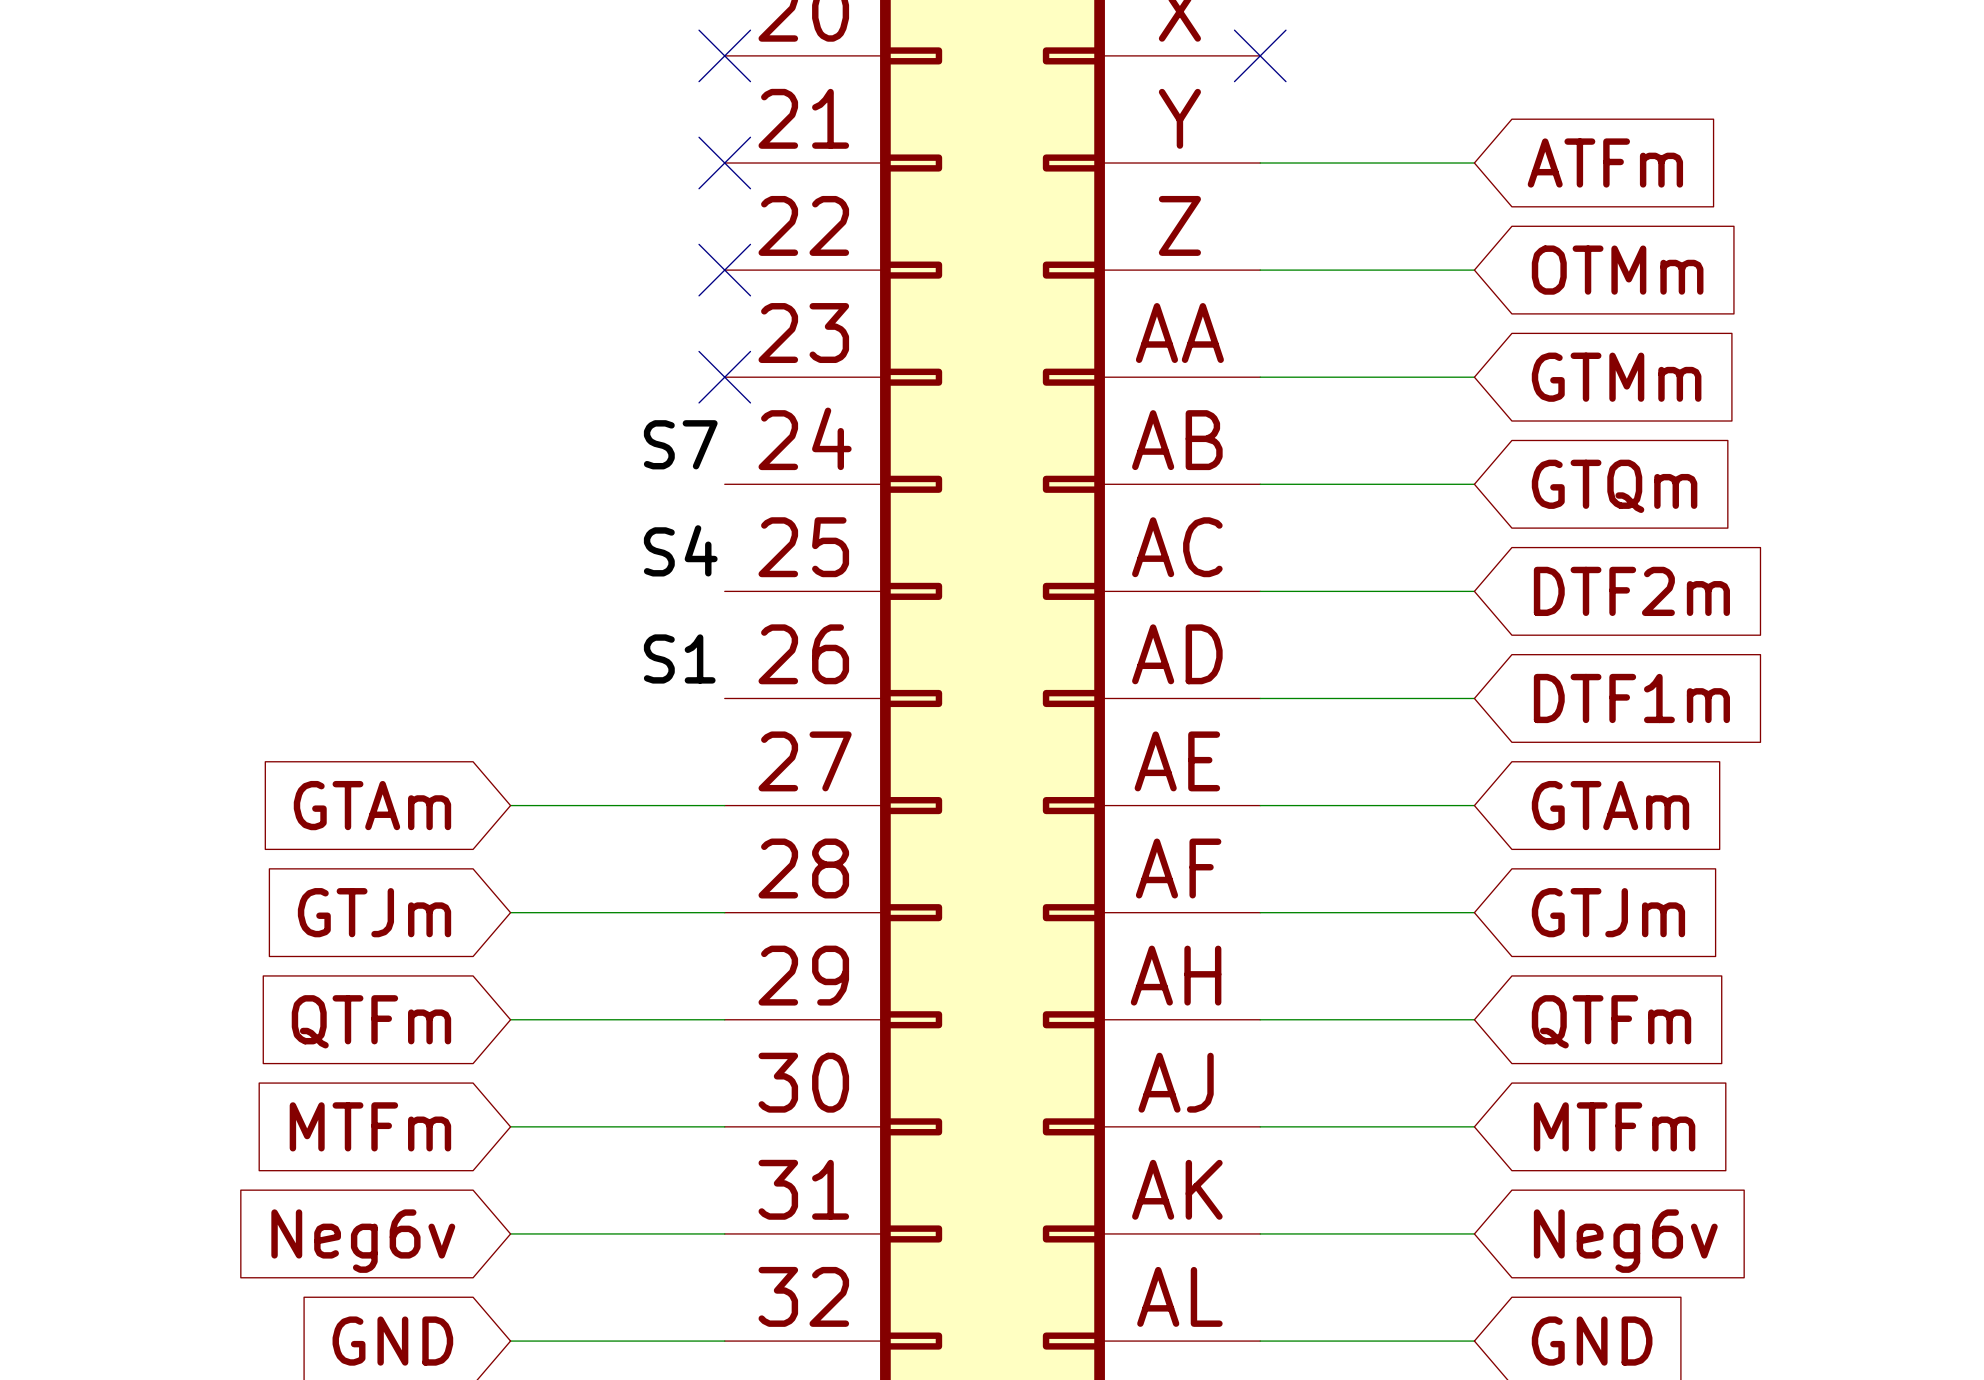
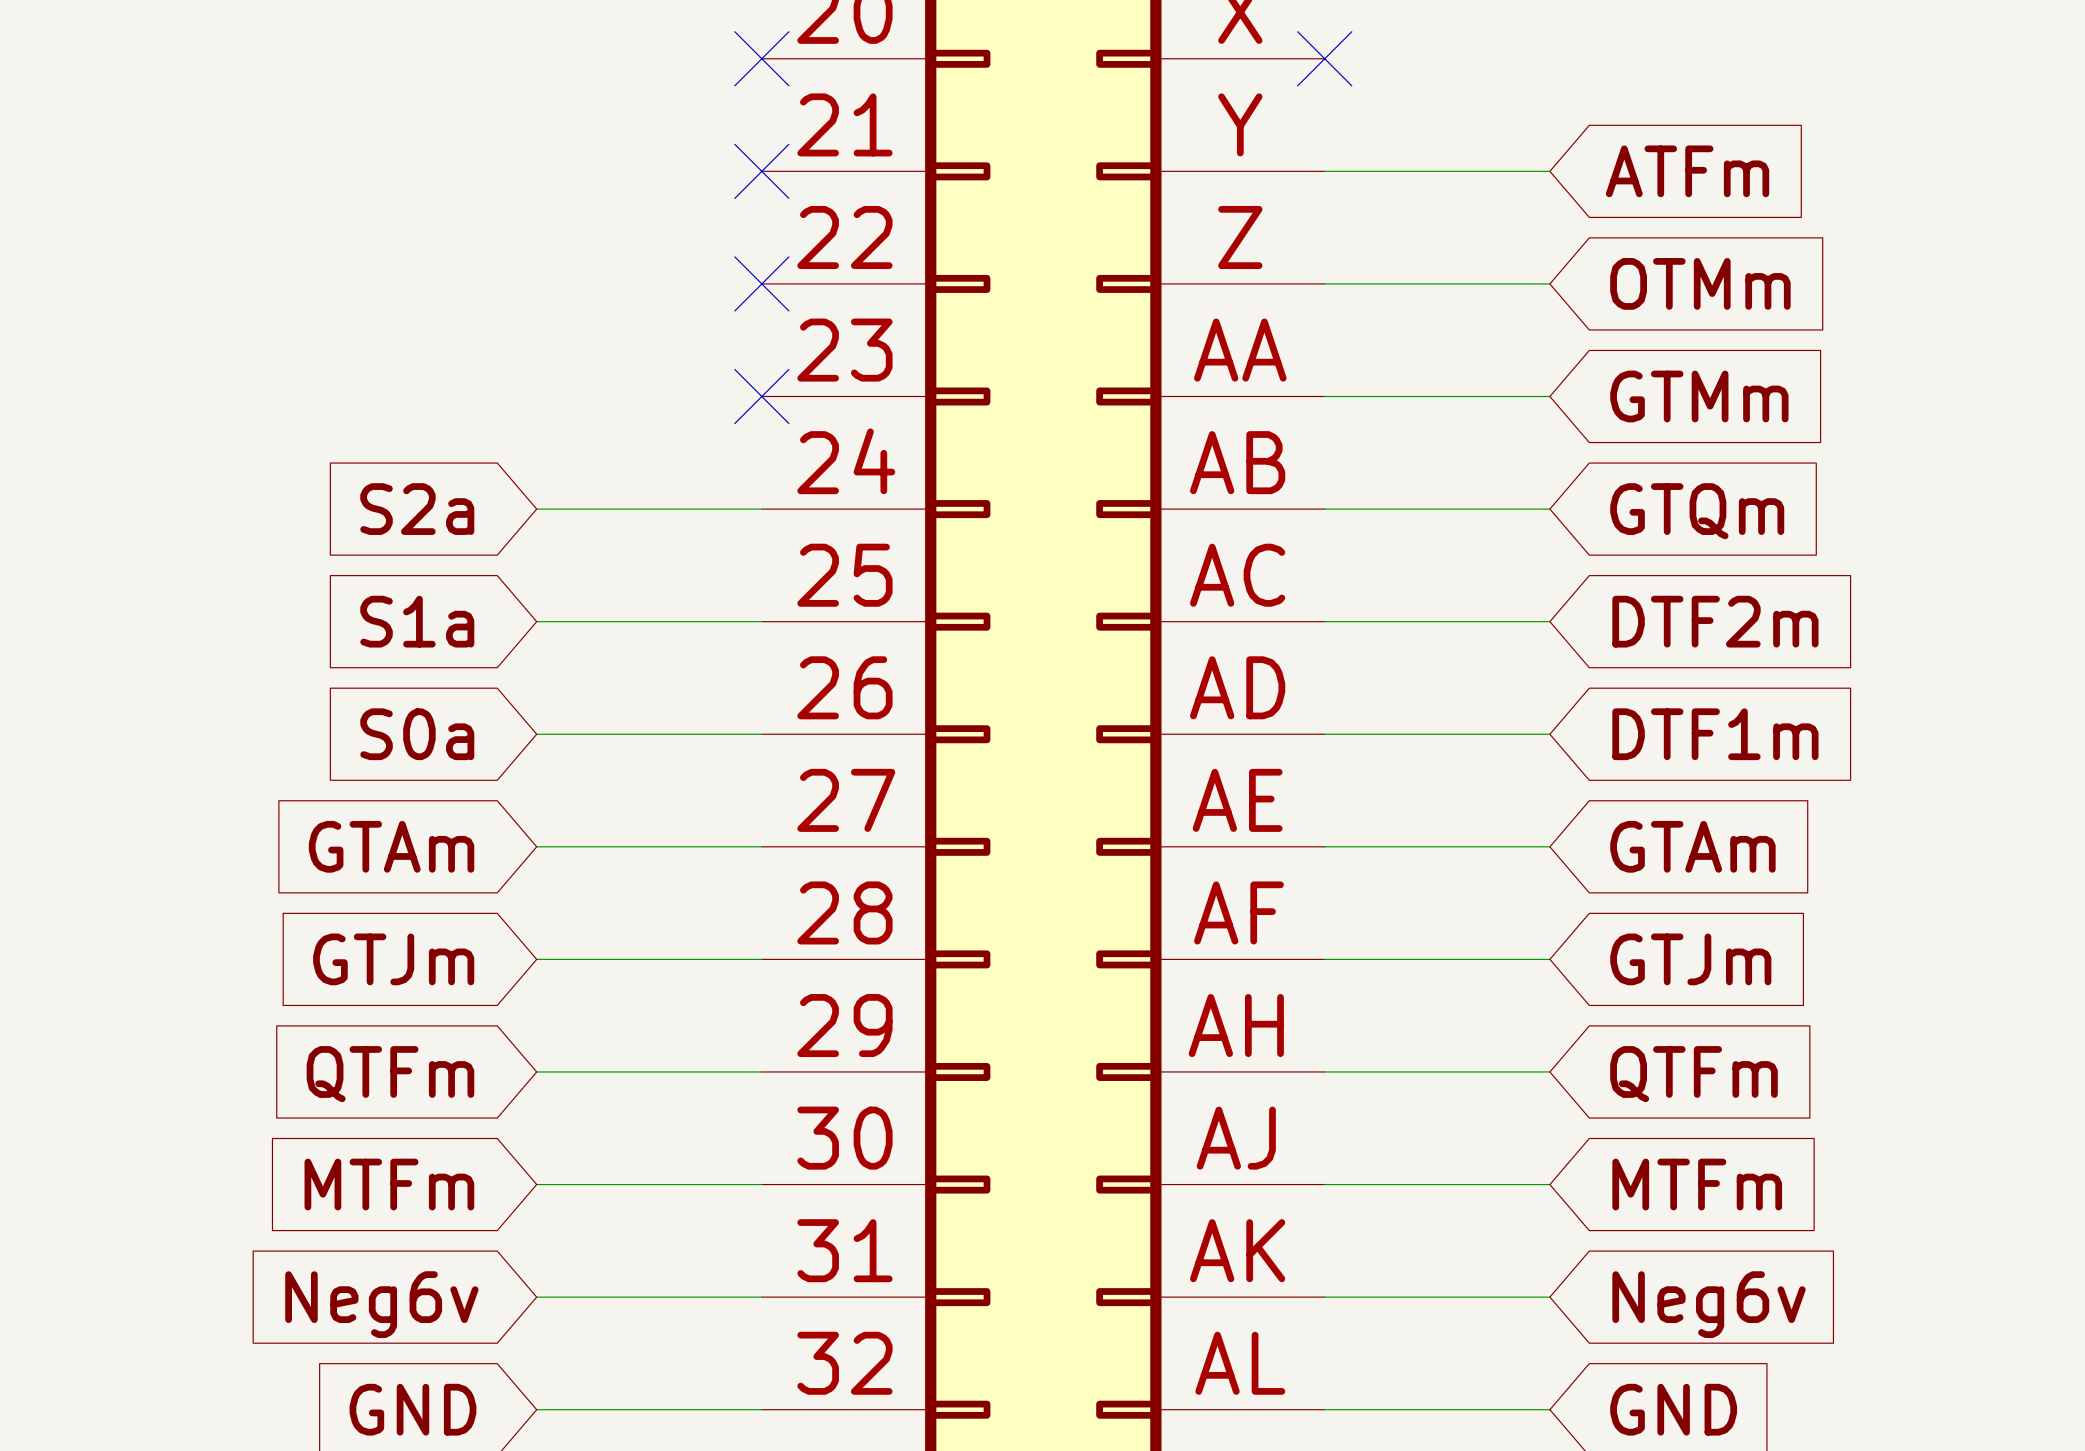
label: S7 (680, 444) -> none
global label: none -> S2a (417, 509)
wire: none -> (536, 509) (761, 509)
label: S4 (680, 550) -> none
global label: none -> S1a (417, 621)
wire: none -> (536, 621) (761, 621)
label: S1 (679, 658) -> none
global label: none -> S0a (417, 734)
wire: none -> (536, 734) (761, 734)

